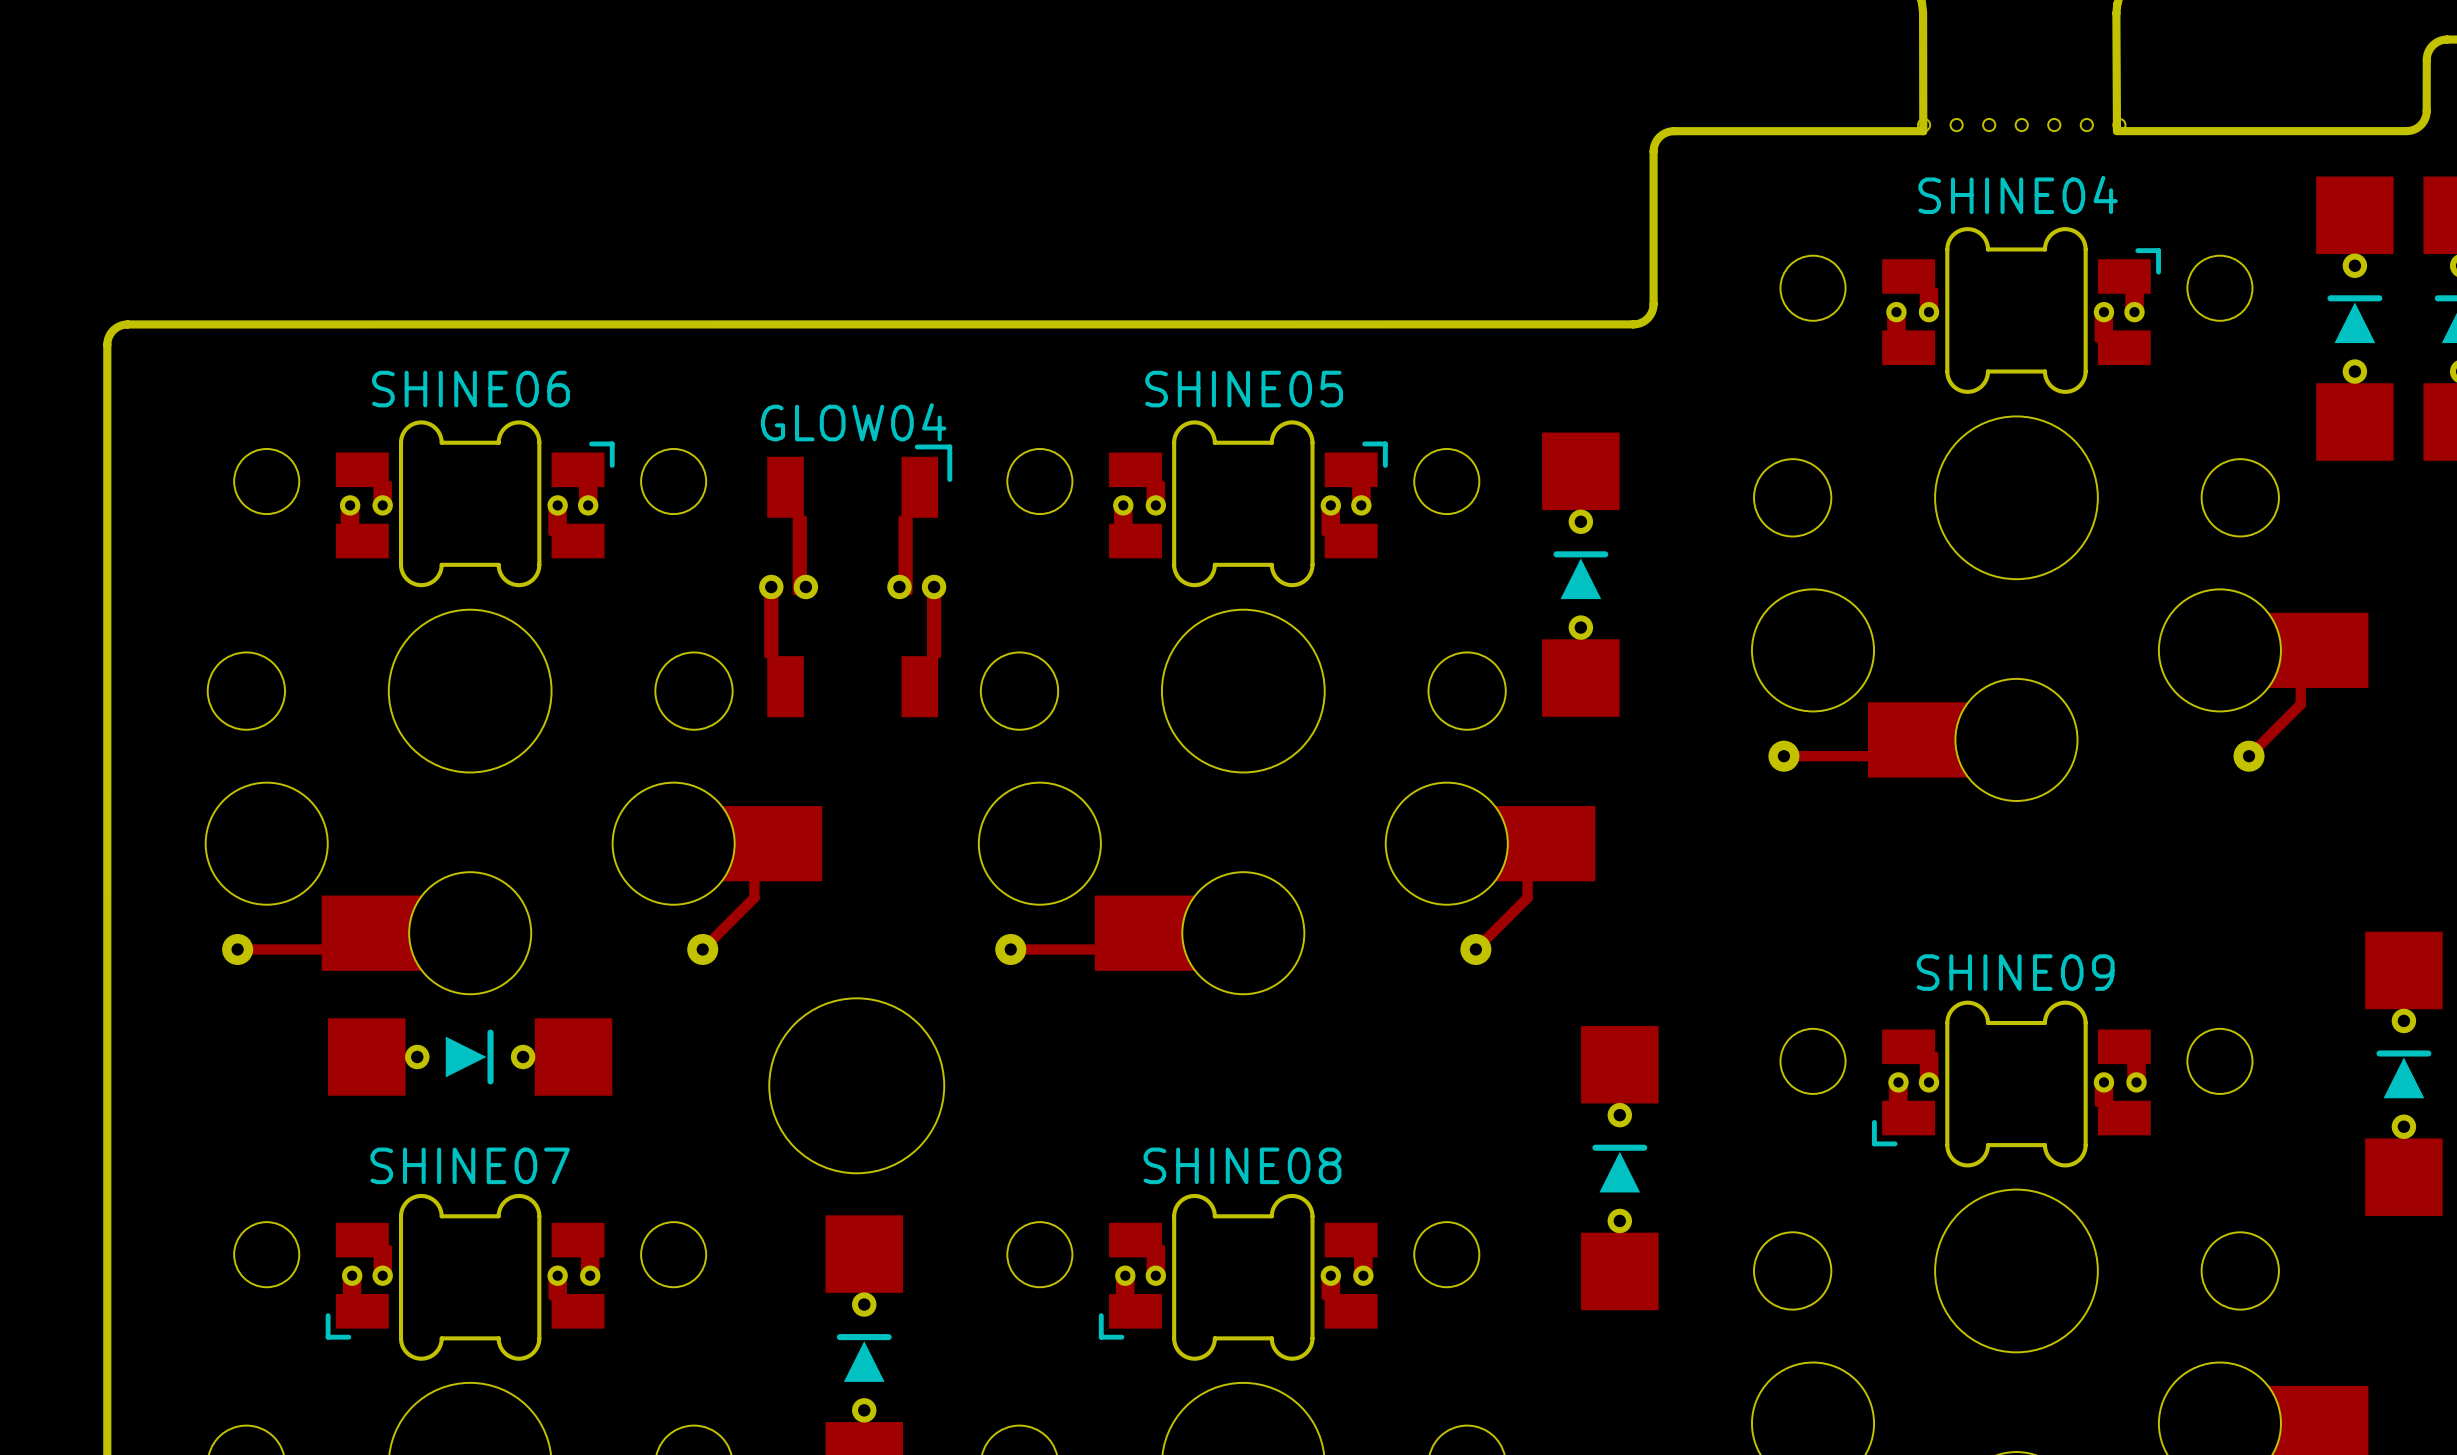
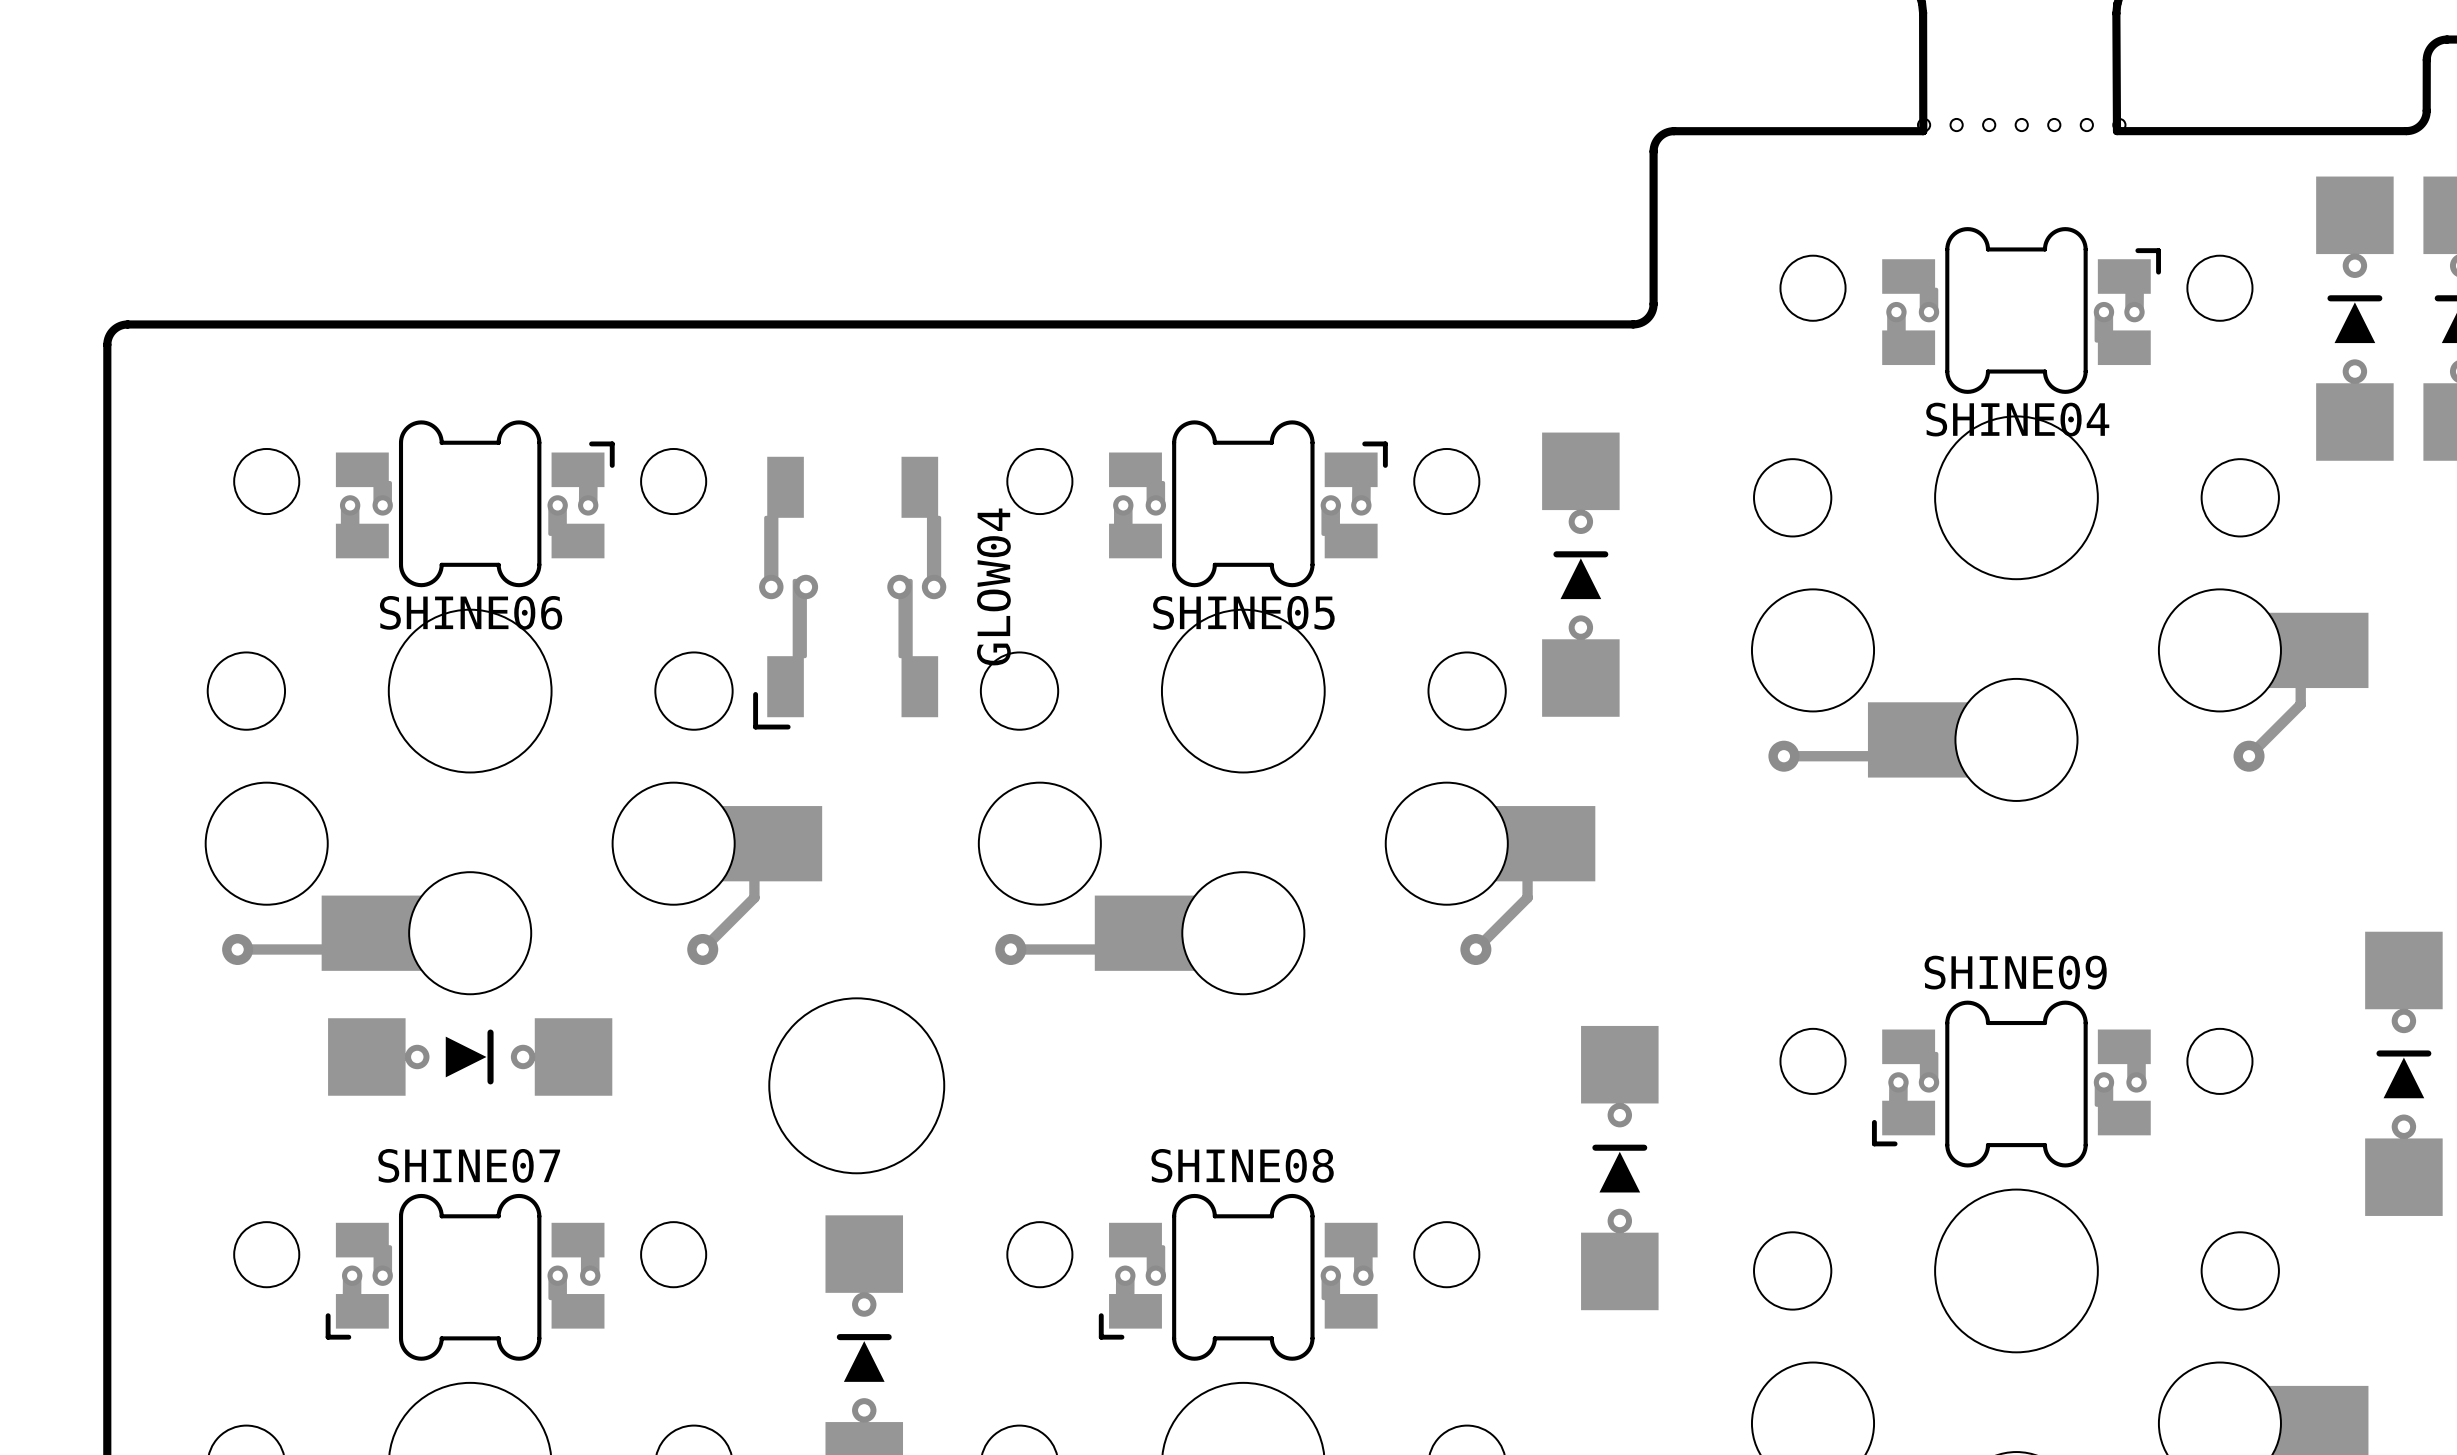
SHINE04 name position: SHINE04 (2018, 194) -> SHINE04 (2017, 419)
SHINE06 name position: SHINE06 (470, 389) -> SHINE06 (471, 612)
SHINE05 name position: SHINE05 (1244, 389) -> SHINE05 (1243, 612)
GLOW04 name position: GLOW04 (853, 422) -> GLOW04 (993, 586)
GLOW04 rotation: 0° (855, 580) -> 180° (849, 593)

